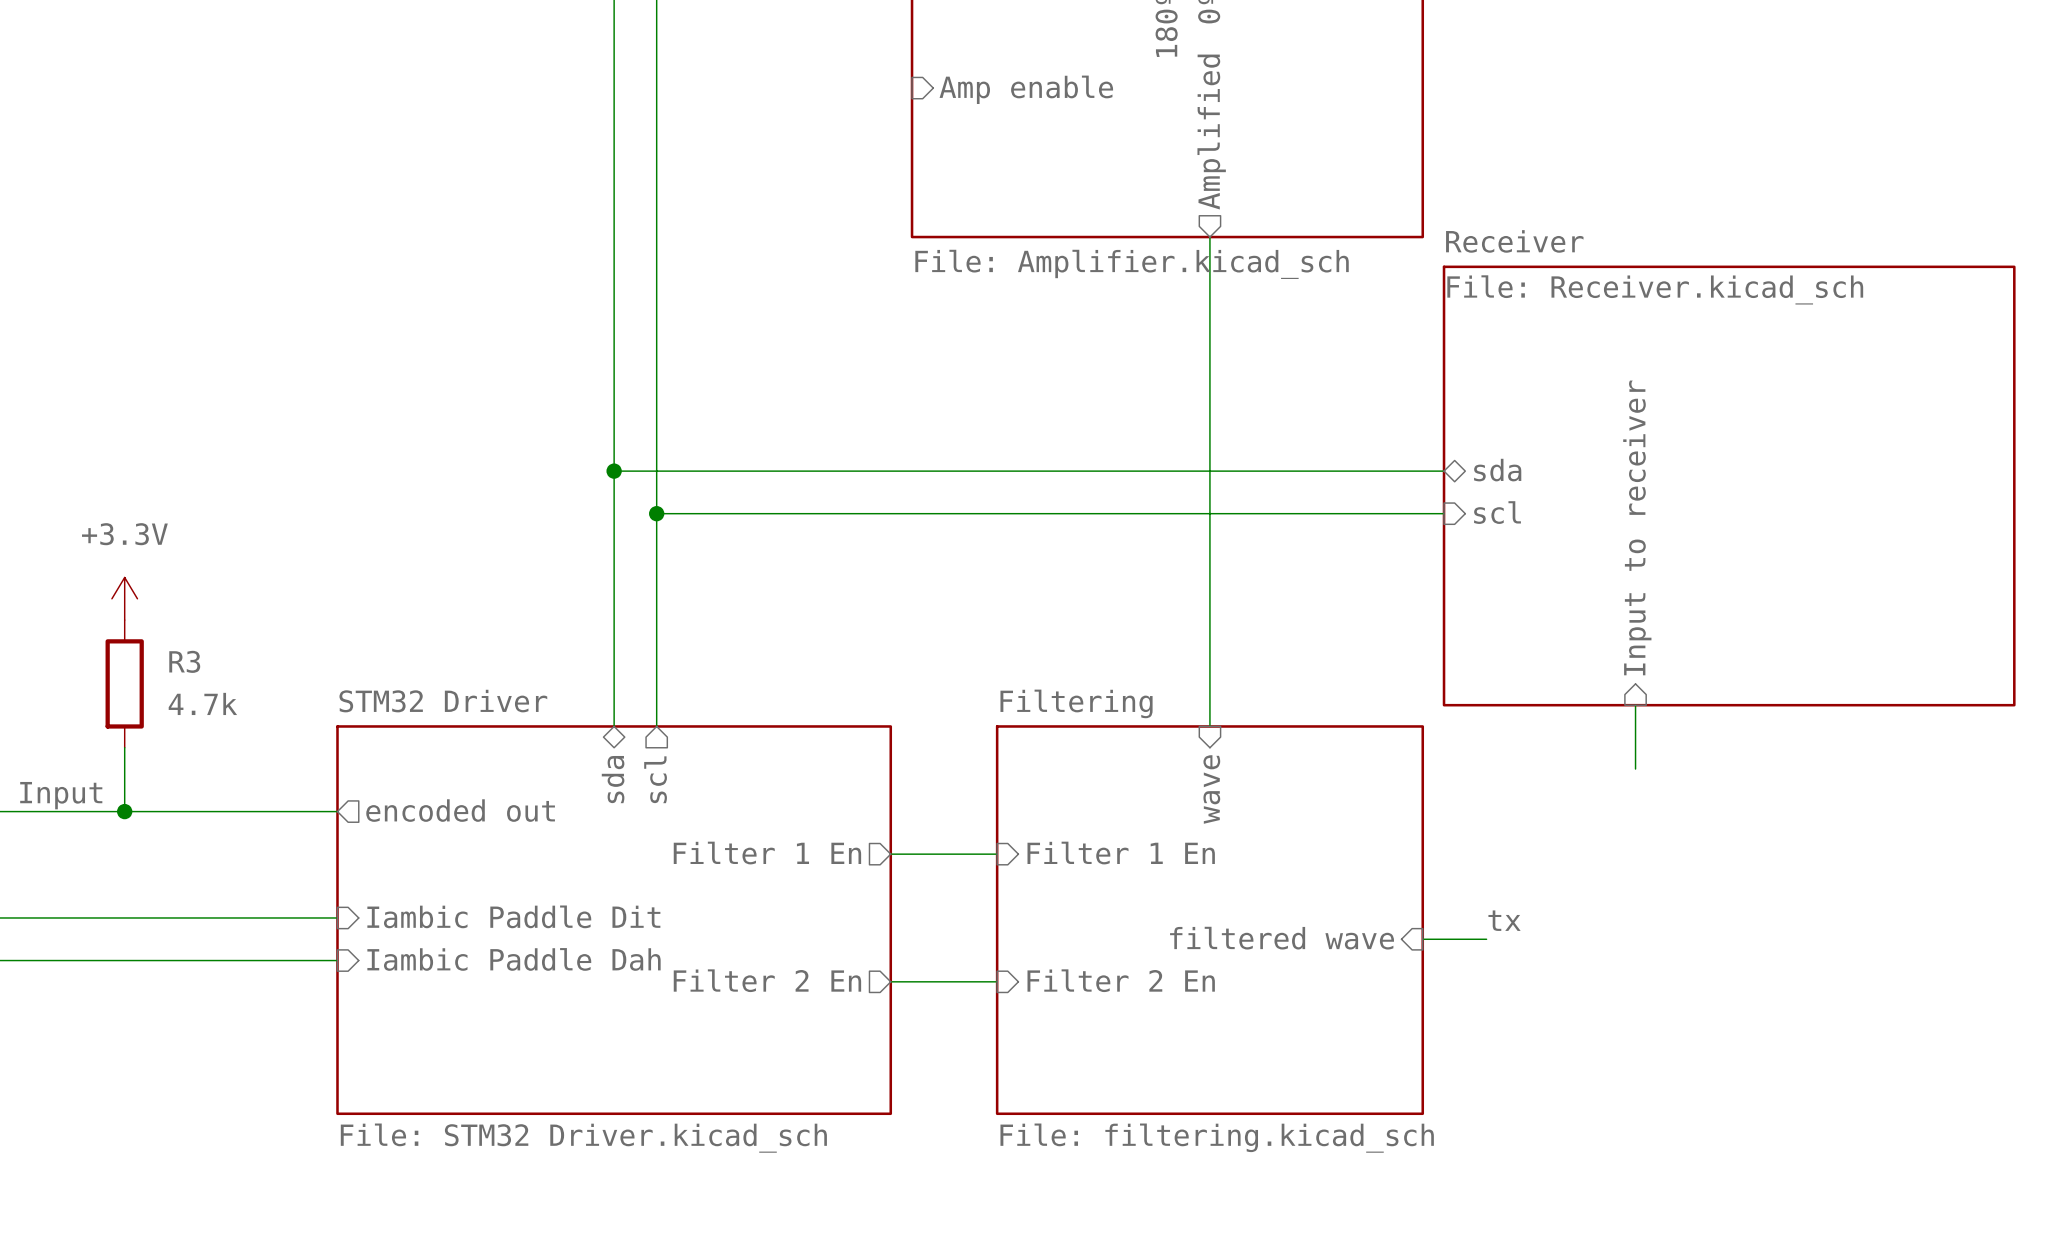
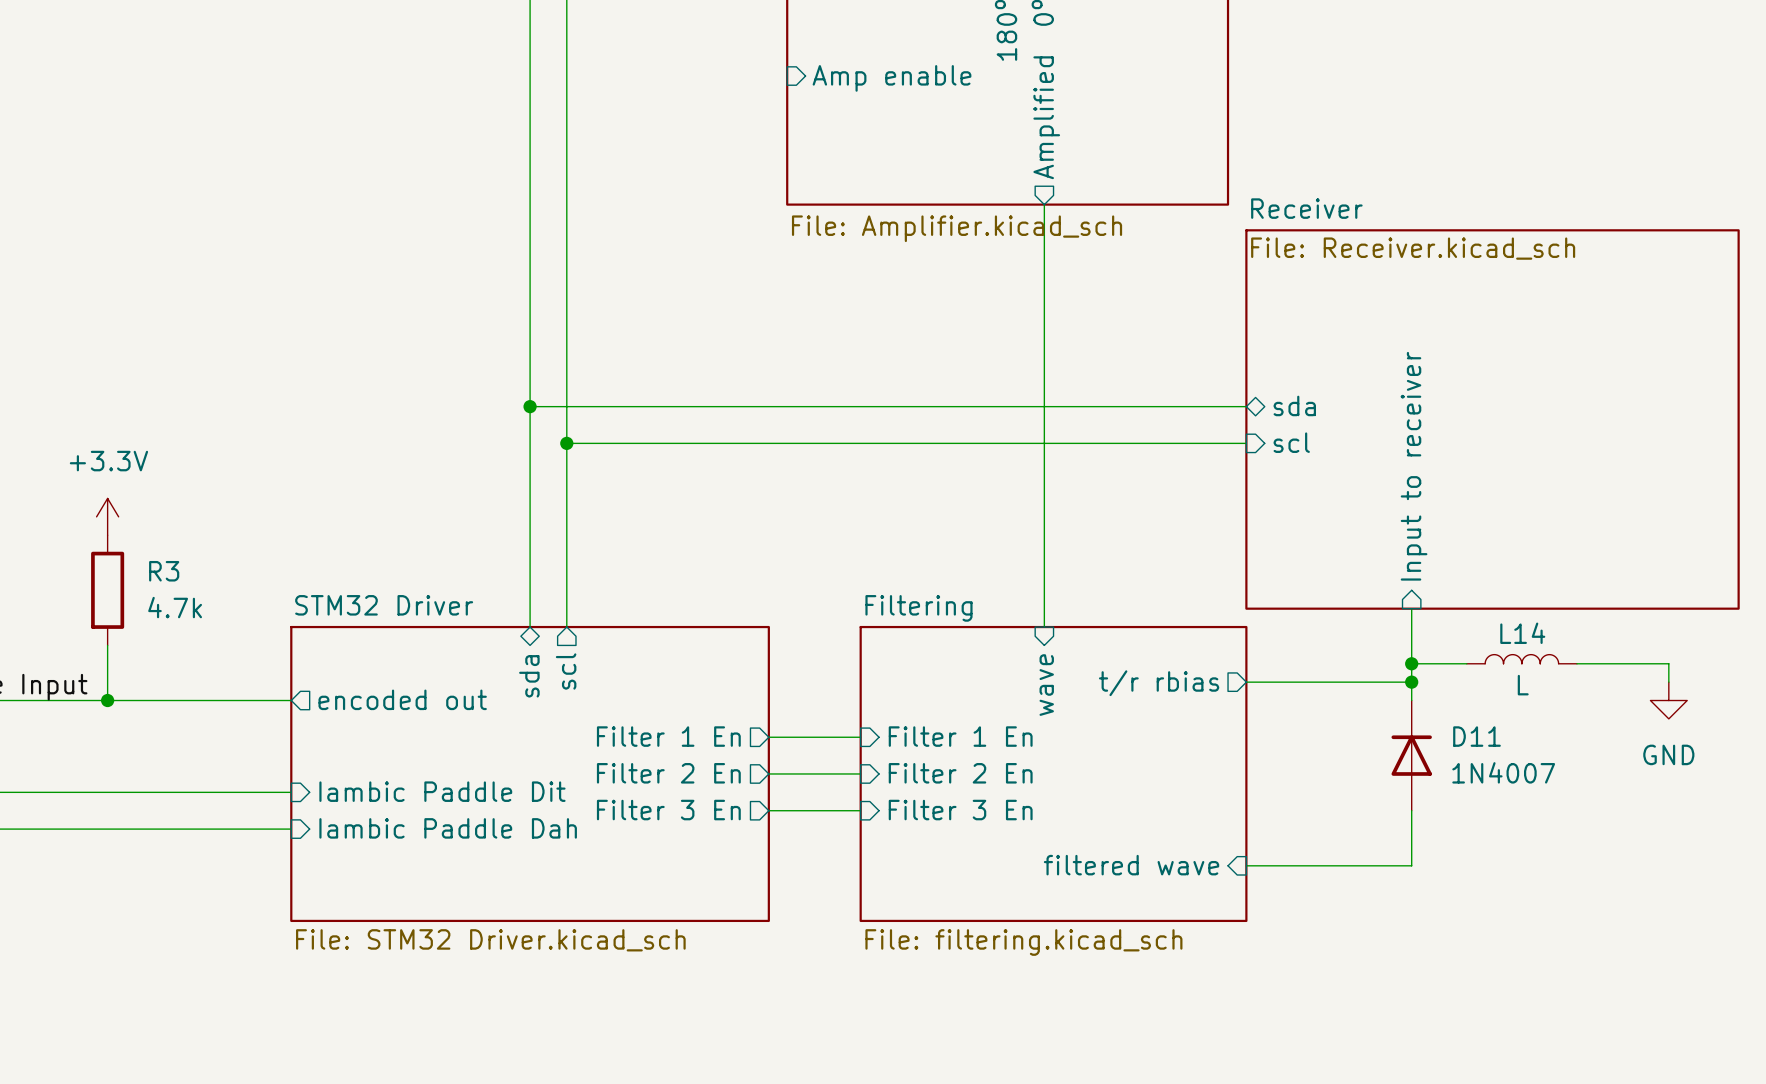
sheet STM32 Driver shape: [336, 725, 893, 1116] -> [290, 625, 770, 923]
L14: none -> L (1521, 659)
junction: none -> (1411, 663)
wire: none -> (1466, 663) (1411, 663) (1411, 700)
wire: none -> (1576, 663) (1668, 663) (1668, 682)
sheet pin: none -> t/r rbias (1159, 683)
wire: none -> (1246, 682) (1411, 682)
junction: none -> (1411, 682)
power symbol: none -> GND (1668, 700)
D11: none -> 1N4007 (1411, 755)
wire: none -> (768, 773) (860, 773)
sheet Filtering: none -> File: filtering.kicad_sch (1053, 773)
sheet Filtering: File: filtering.kicad_sch (1209, 920) -> none
label: tx (1504, 920) -> none
sheet pin: none -> Filter 3 En (668, 810)
sheet pin: none -> Filter 3 En (960, 810)
sheet pin position: filtered wave (1282, 938) -> filtered wave (1131, 865)
wire: (1422, 939) (1486, 939) -> none
wire: none -> (1411, 810) (1411, 865) (1246, 865)
sheet pin position: Filter 2 En (767, 980) -> Filter 2 En (668, 773)
sheet pin position: Filter 2 En (1121, 980) -> Filter 2 En (960, 773)
wire: (890, 981) (997, 981) -> (768, 810) (860, 810)

